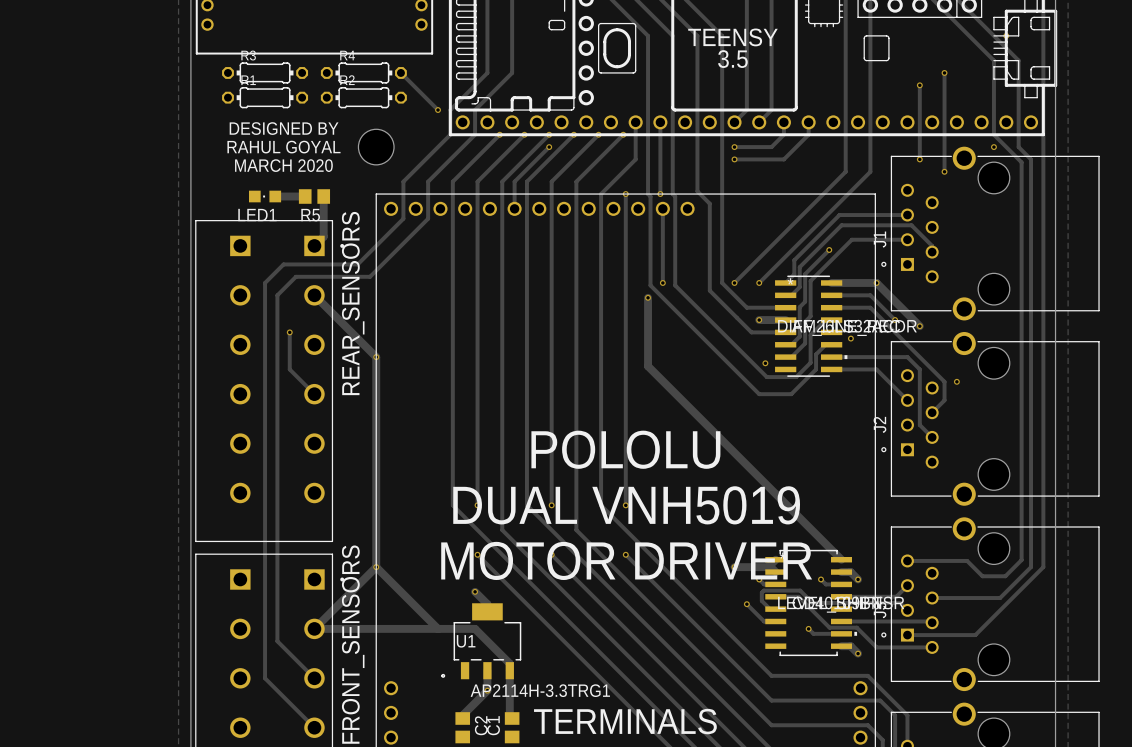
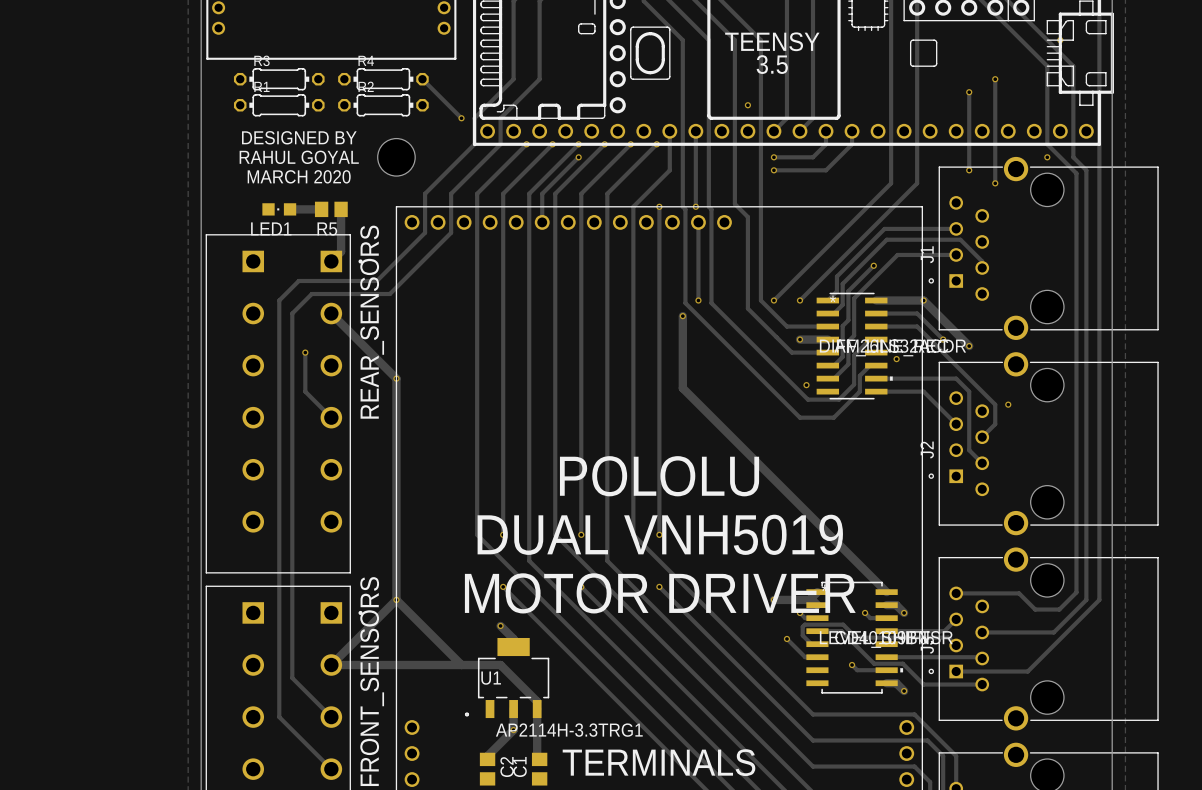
via: none -> (747, 105)

